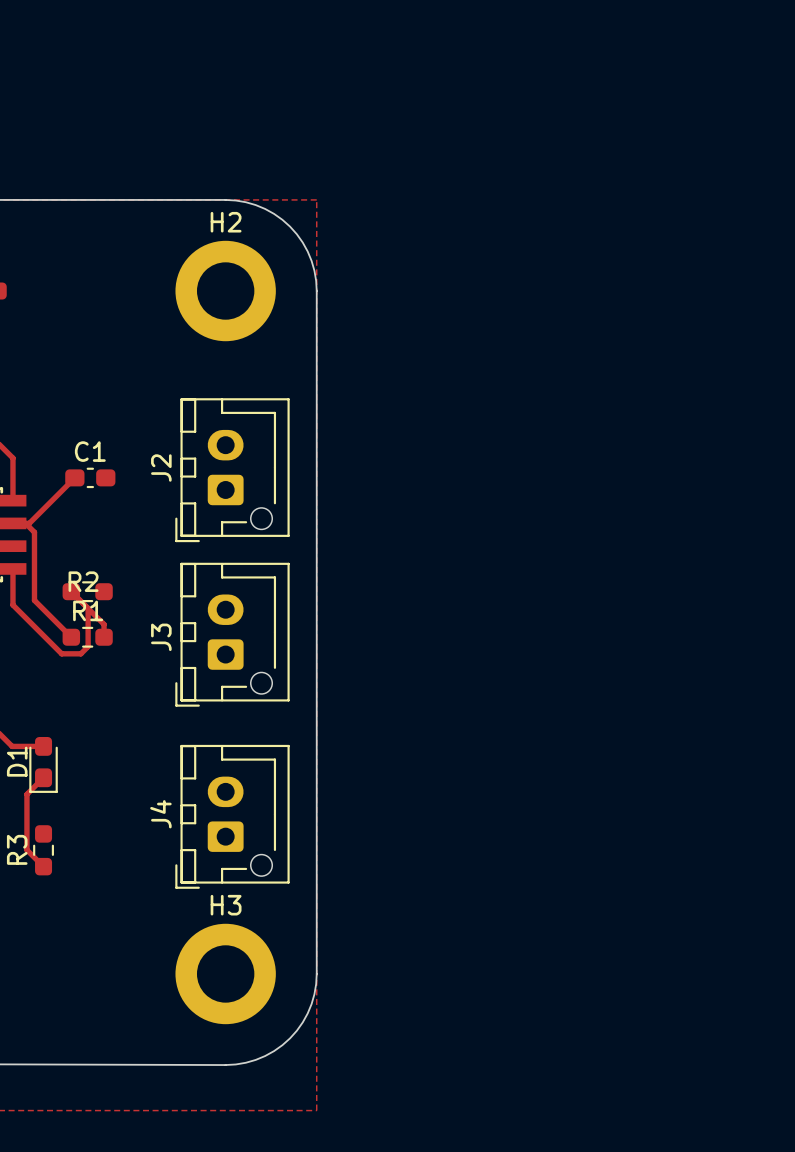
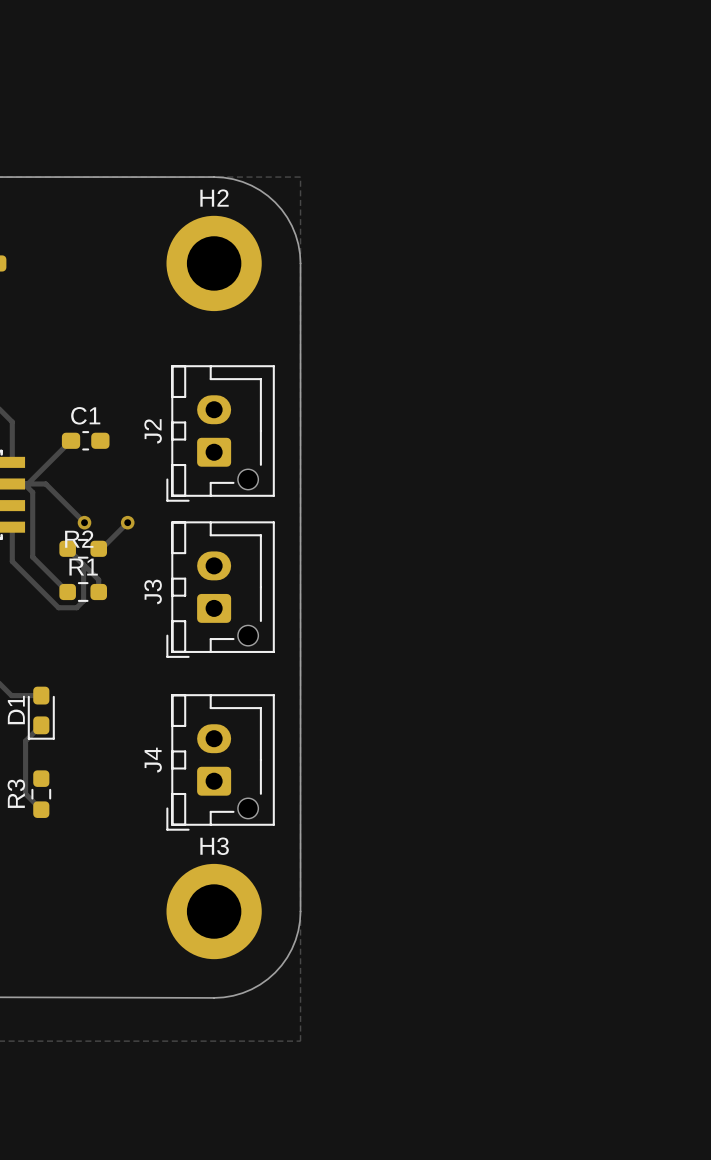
track: none -> (27, 483) (45, 483) (84, 522)
via: none -> (84, 522)
track: none -> (127, 522) (101, 548) (98, 548)
via: none -> (127, 522)

